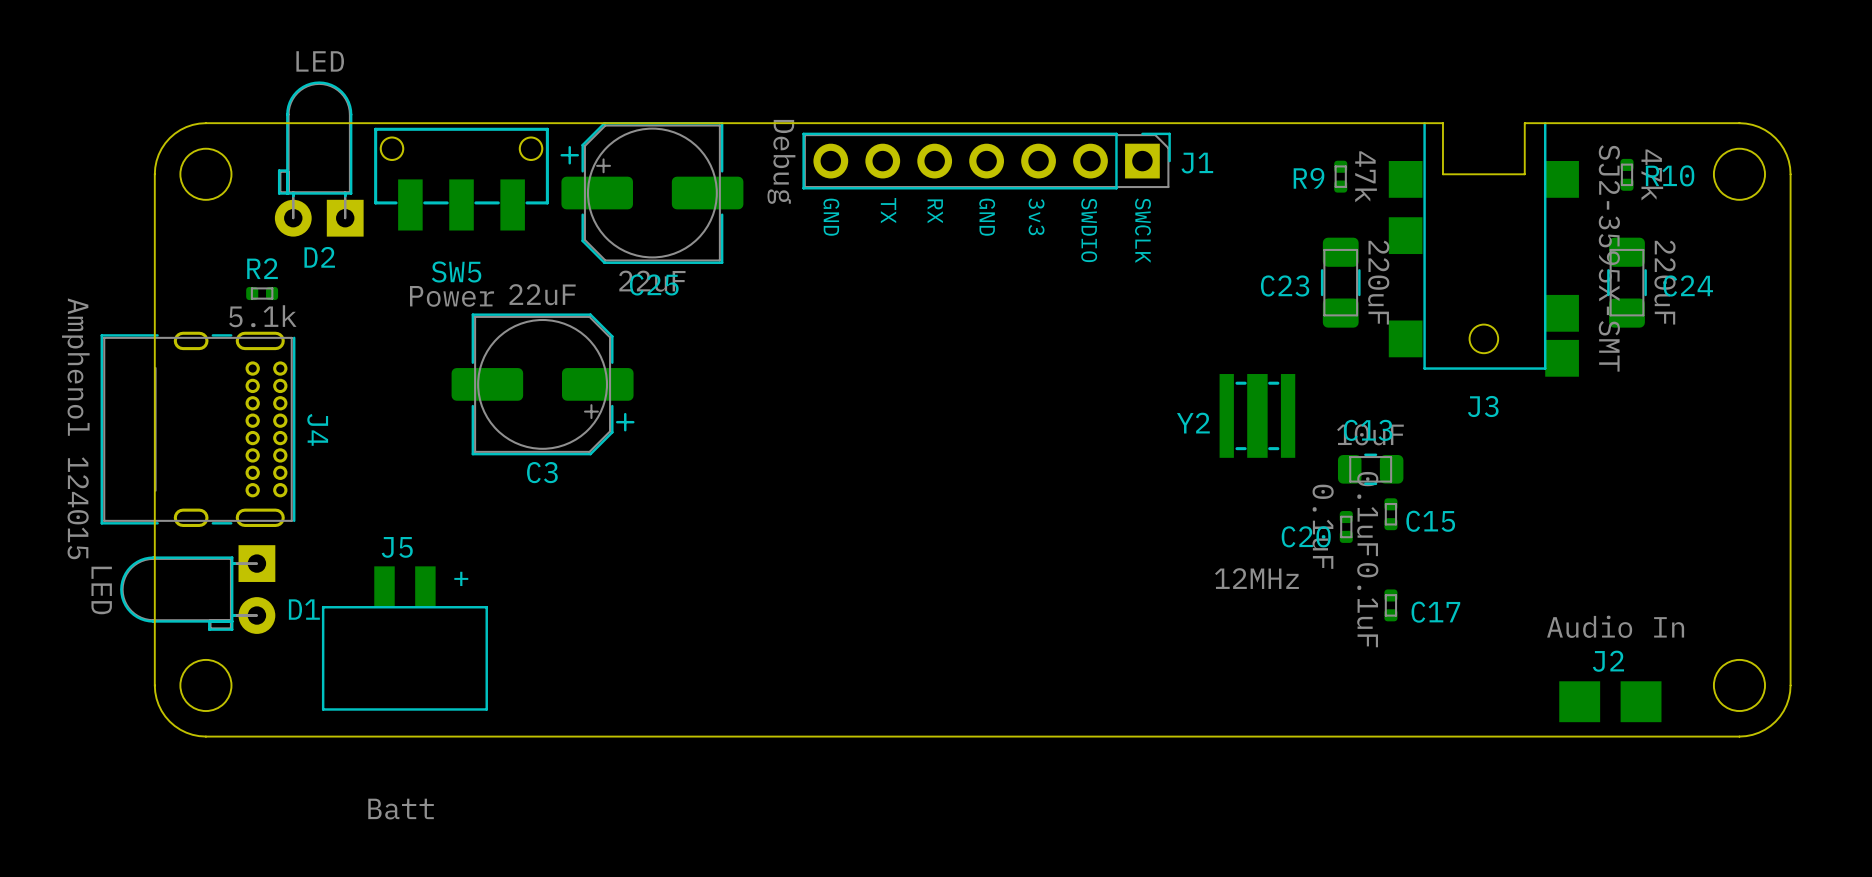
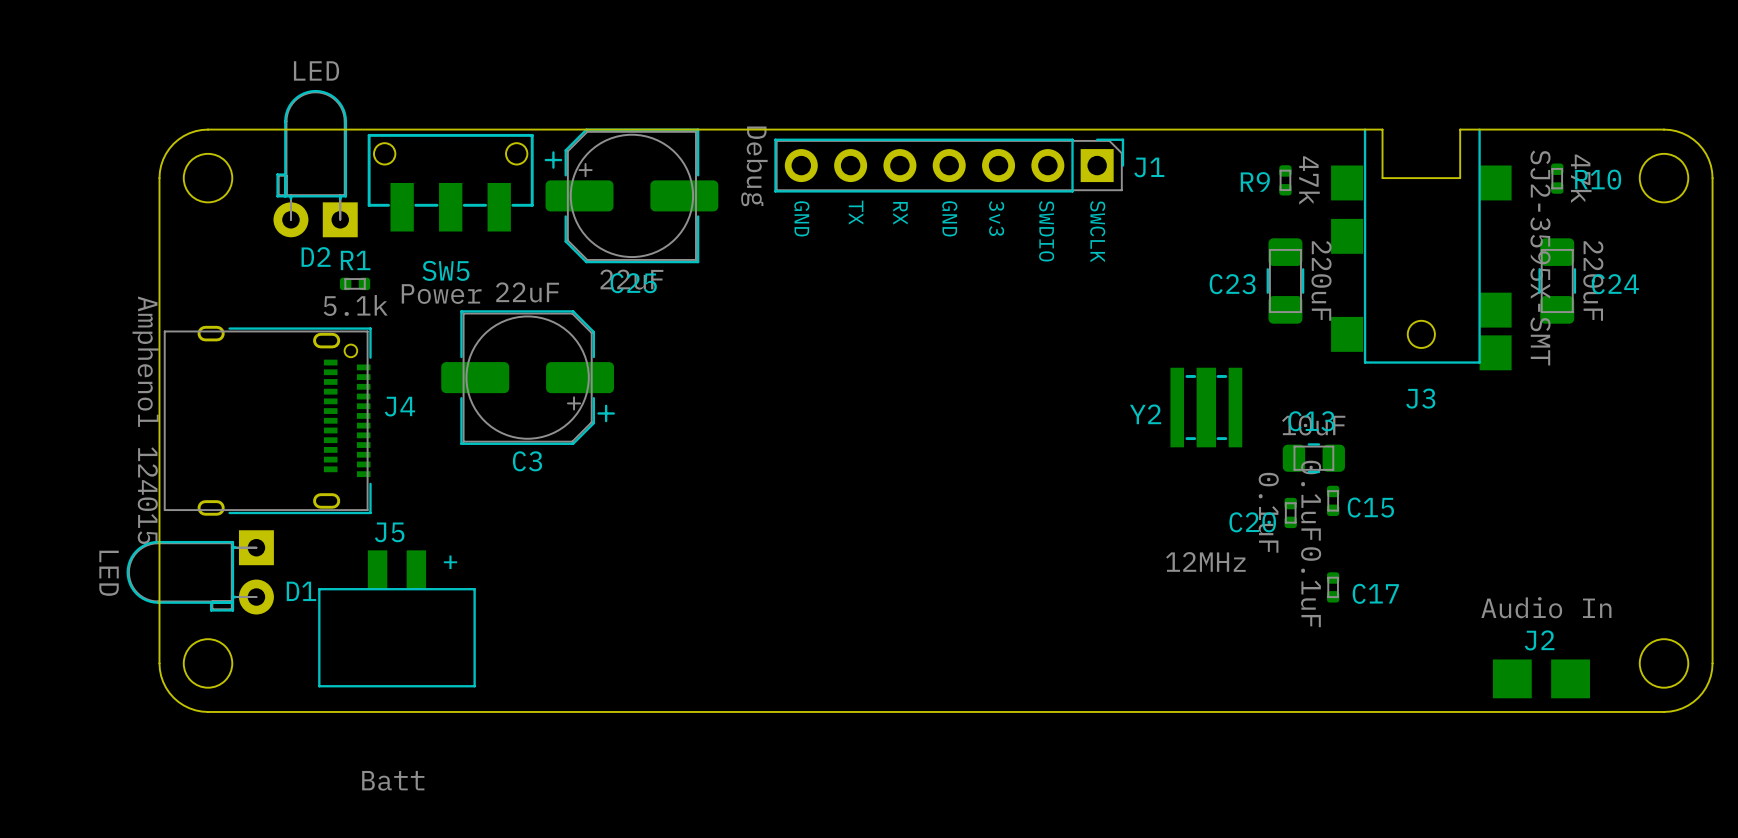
R1: none -> 5.1k (355, 283)
R2: 5.1k (262, 293) -> none
J4 footprint: [100, 331, 296, 528] -> [163, 325, 372, 516]

